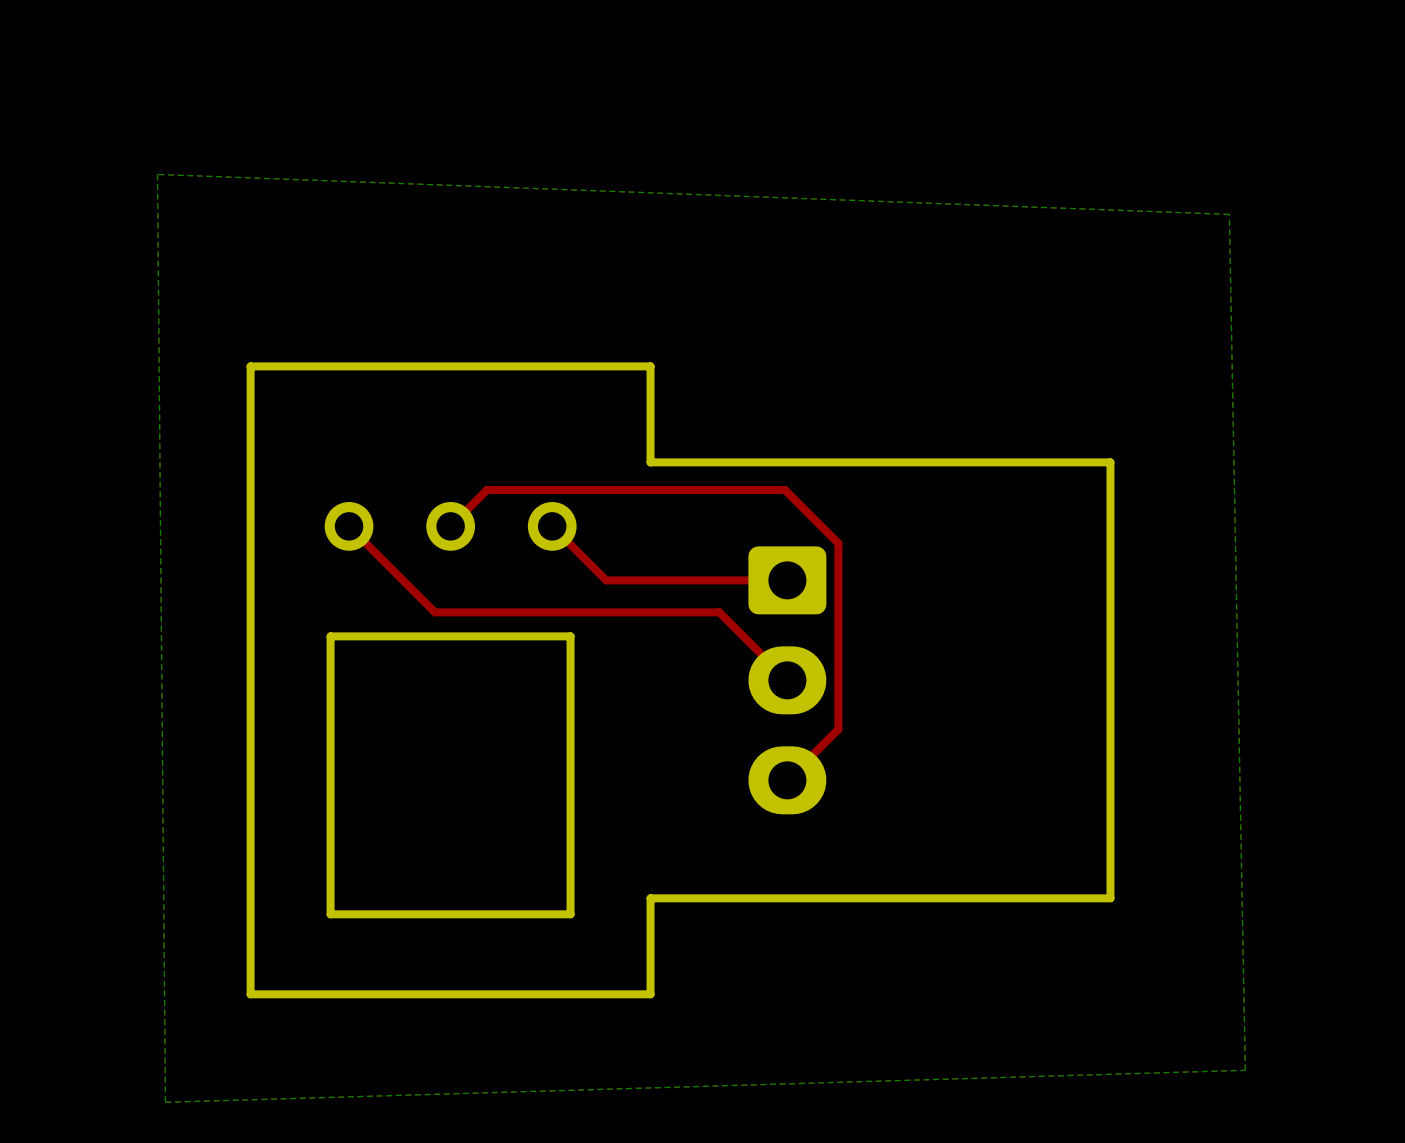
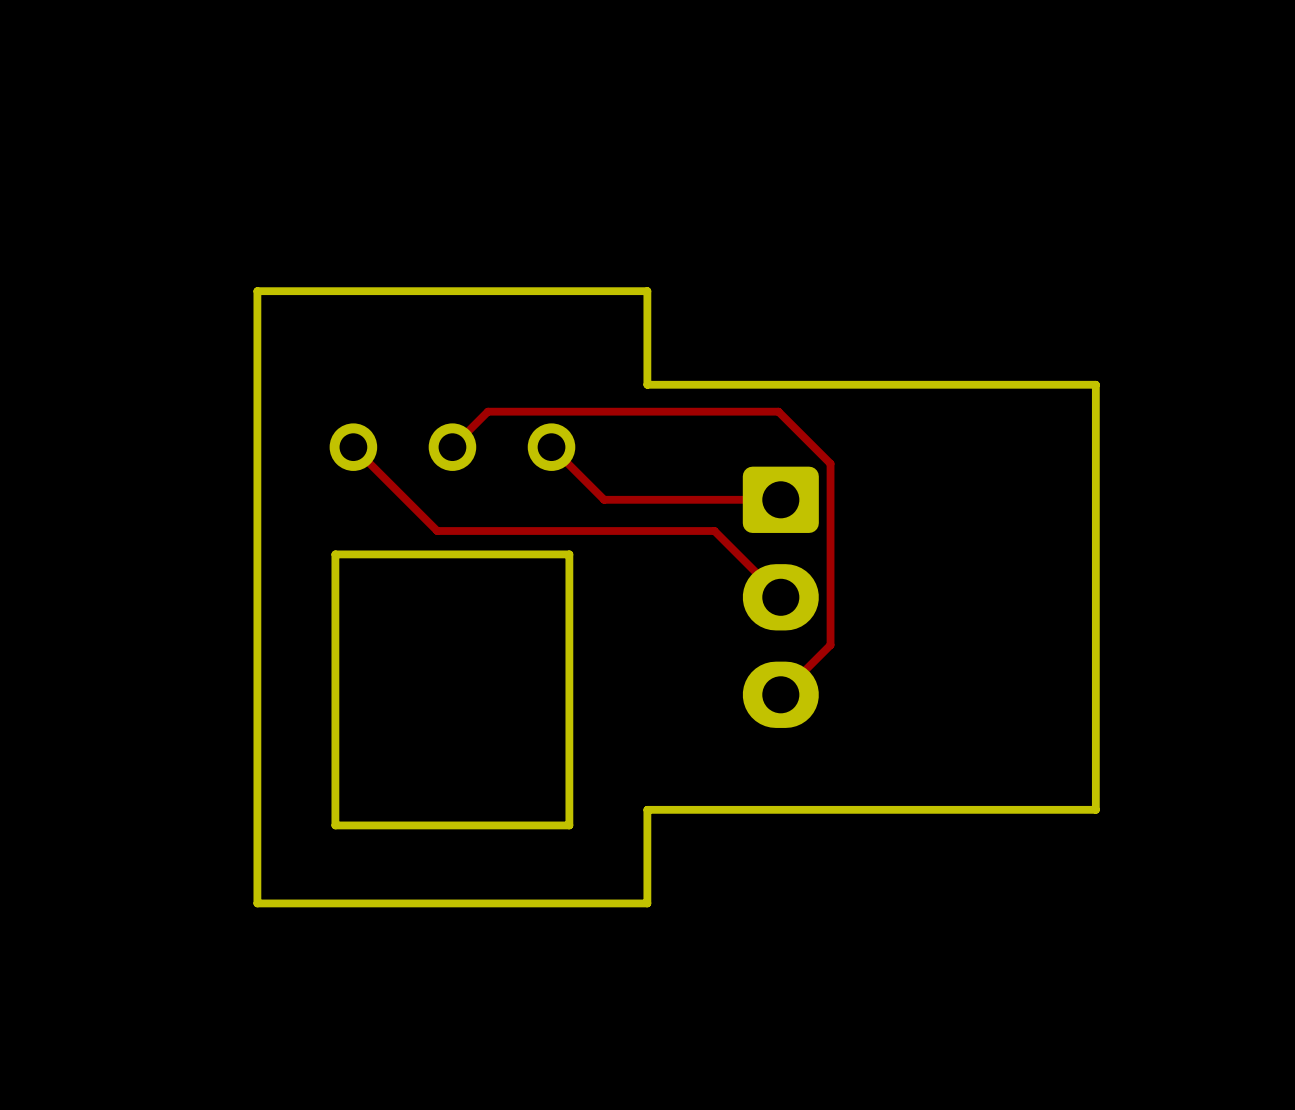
bottom zone outline: (157, 174) (1229, 214) (1245, 1070) (165, 1102) (157, 174) -> none

